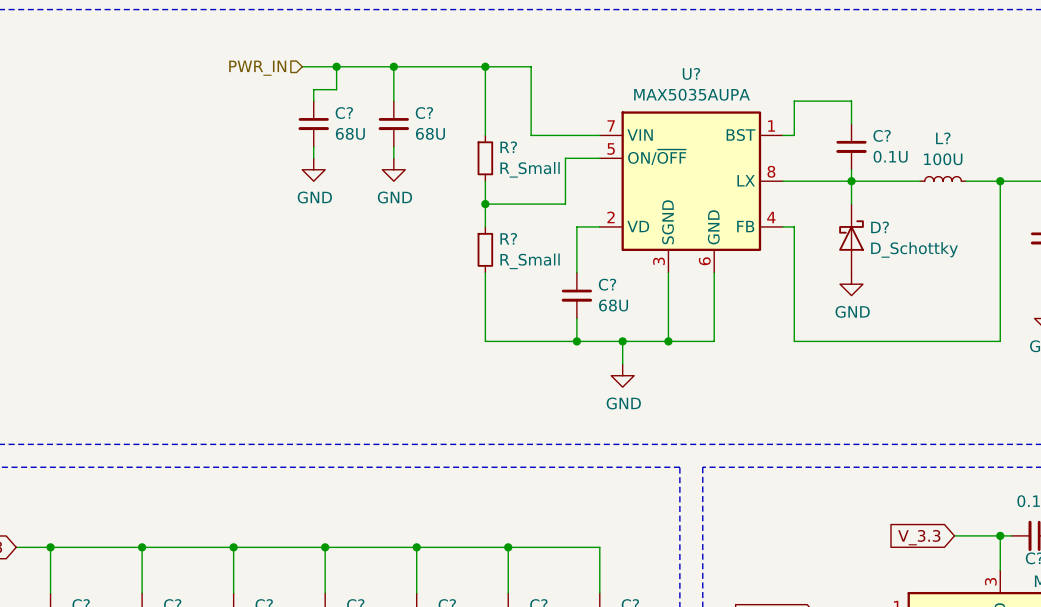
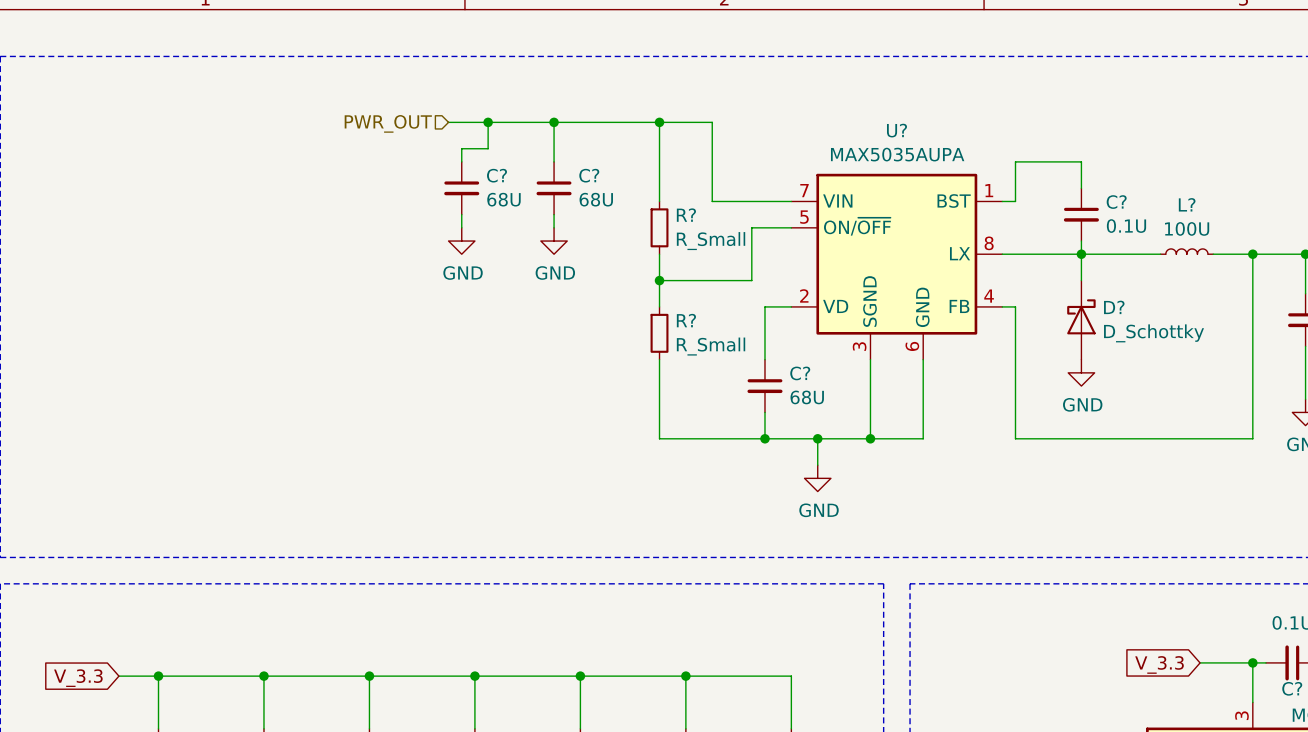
hierarchical label: PWR_IN (257, 68) -> PWR_OUT (388, 123)

